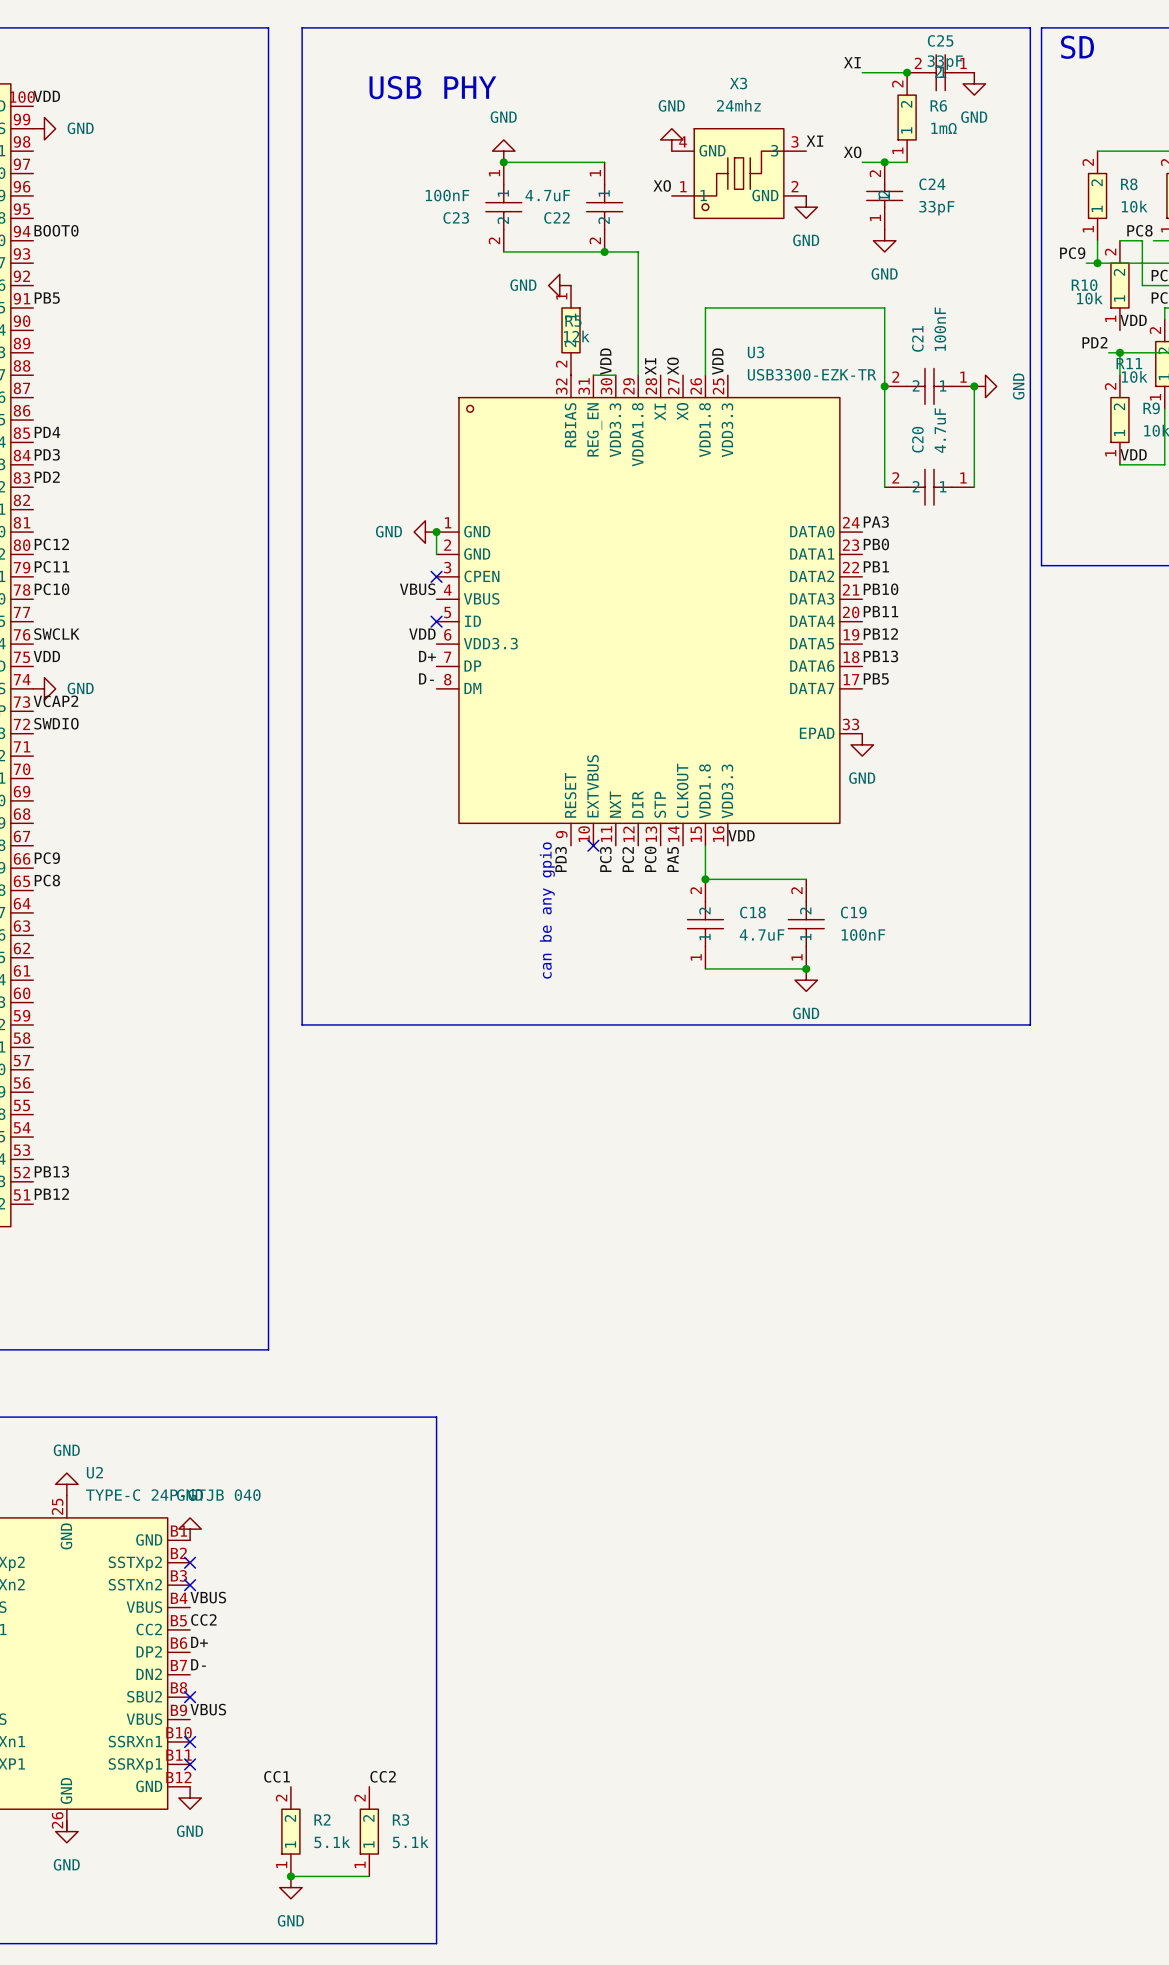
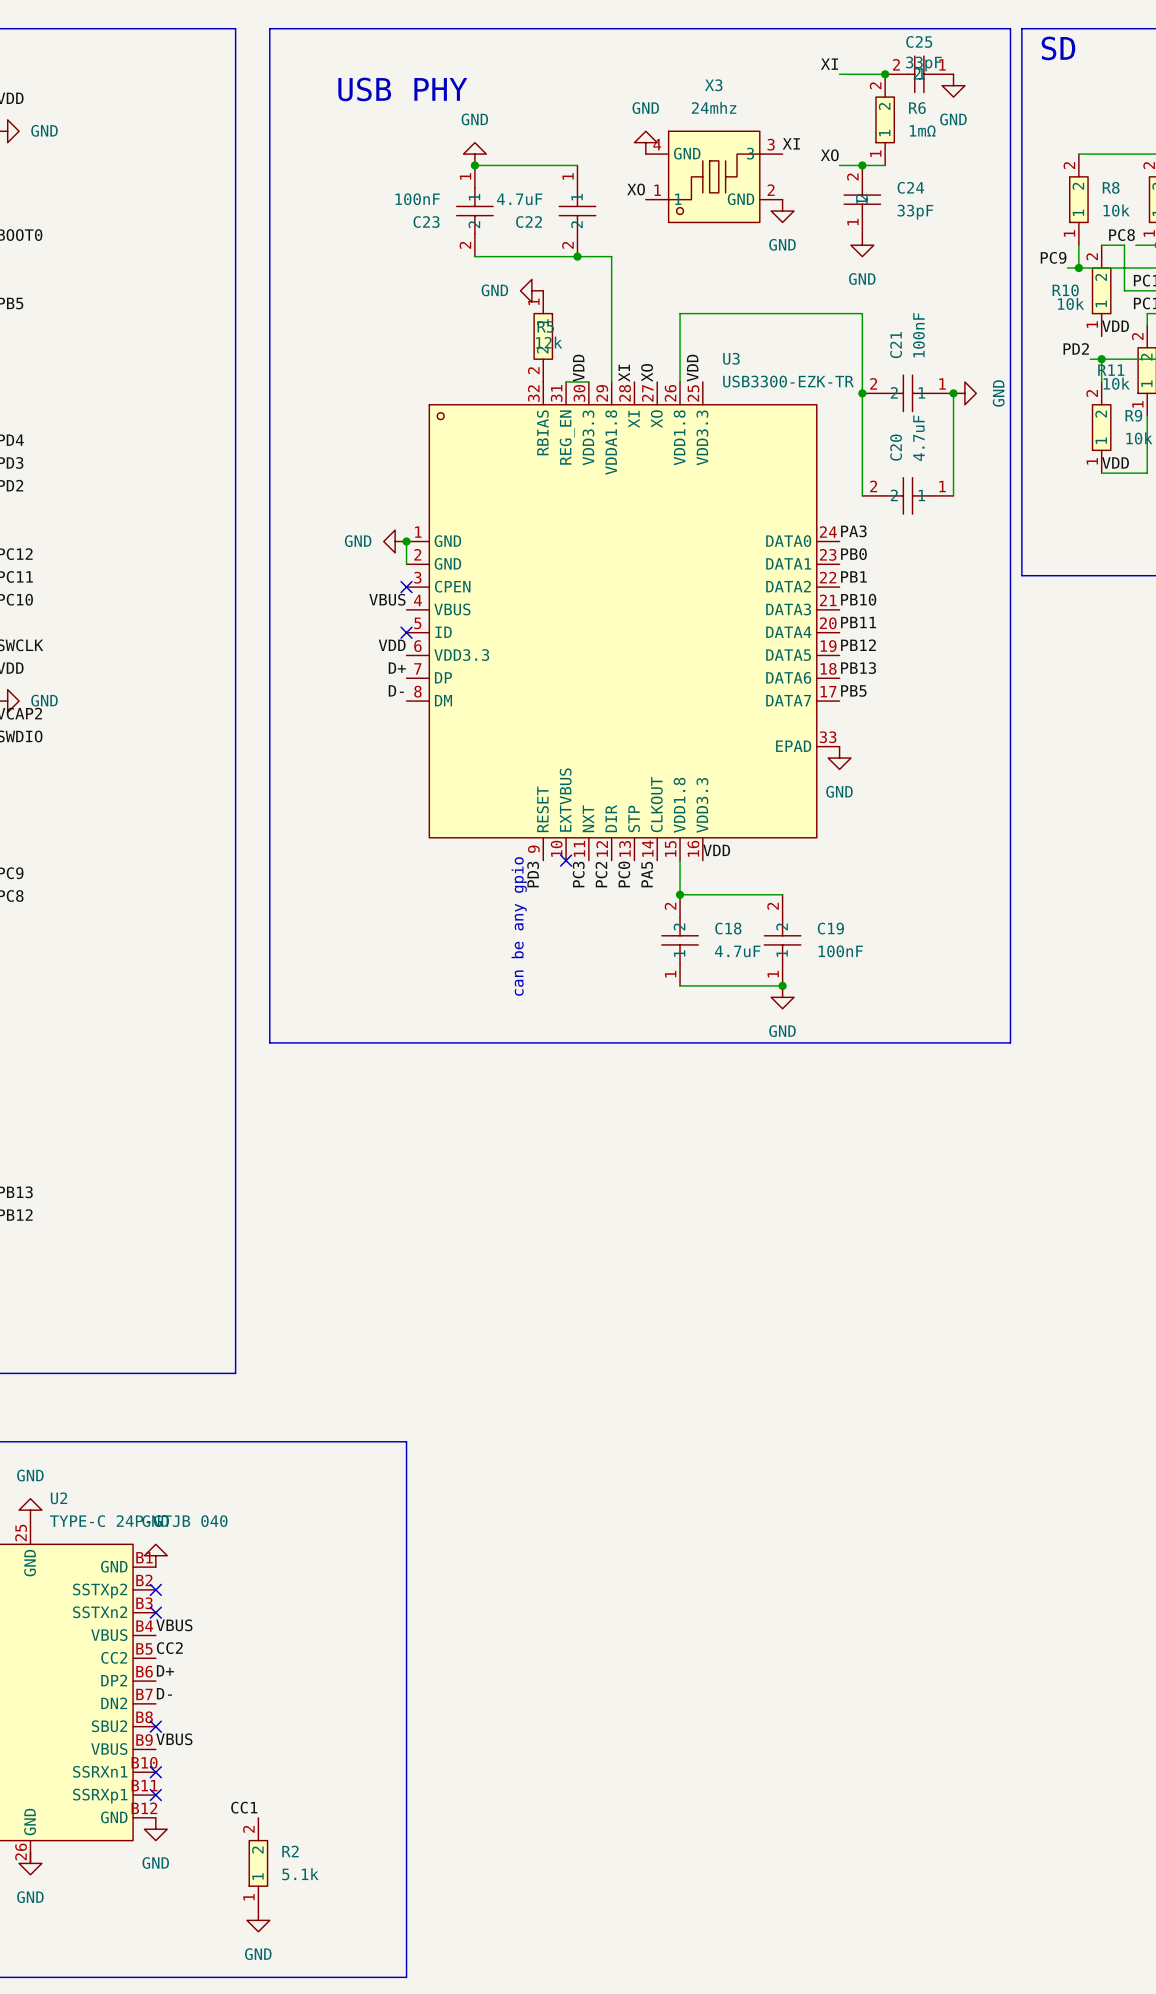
label: CC2 (383, 1776) -> none
R3: 5.1k (369, 1831) -> none
wire: (290, 1876) (369, 1876) -> none
junction: (290, 1876) -> none

